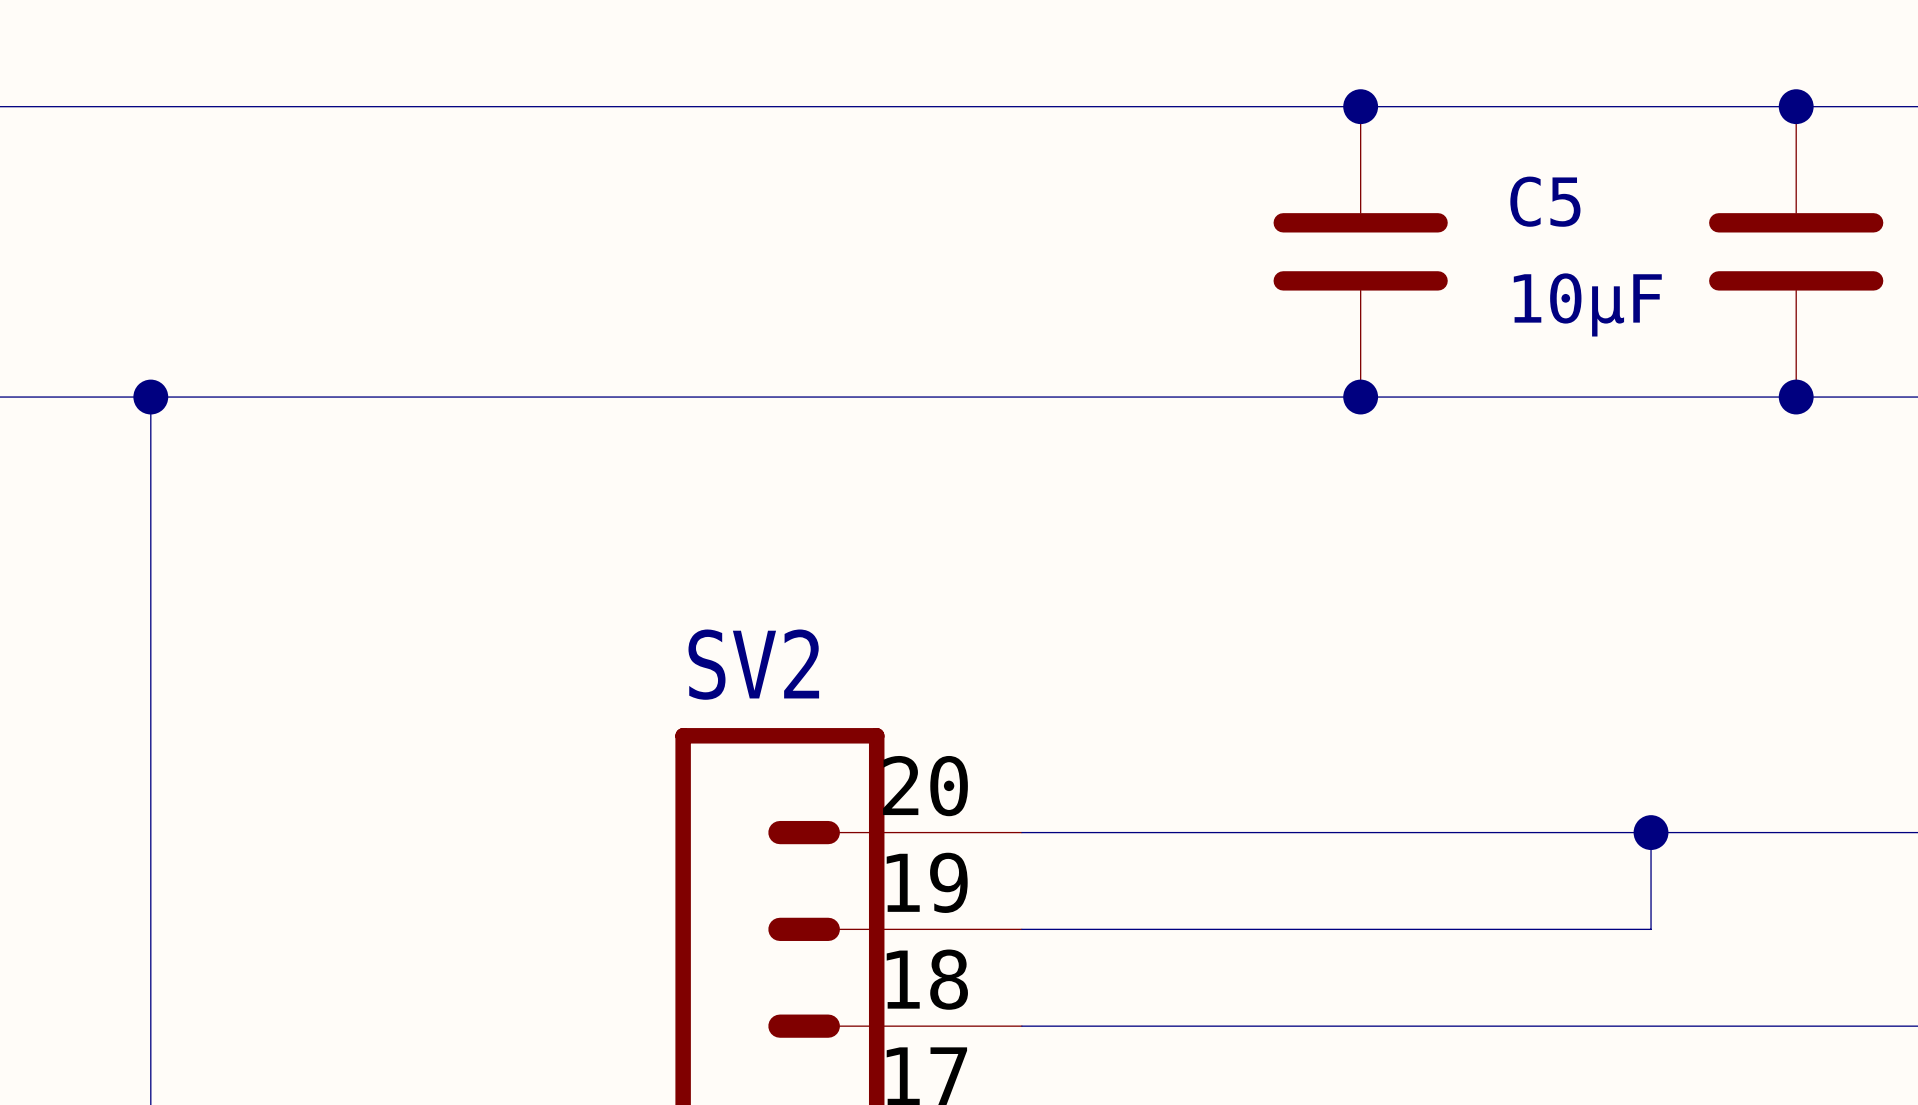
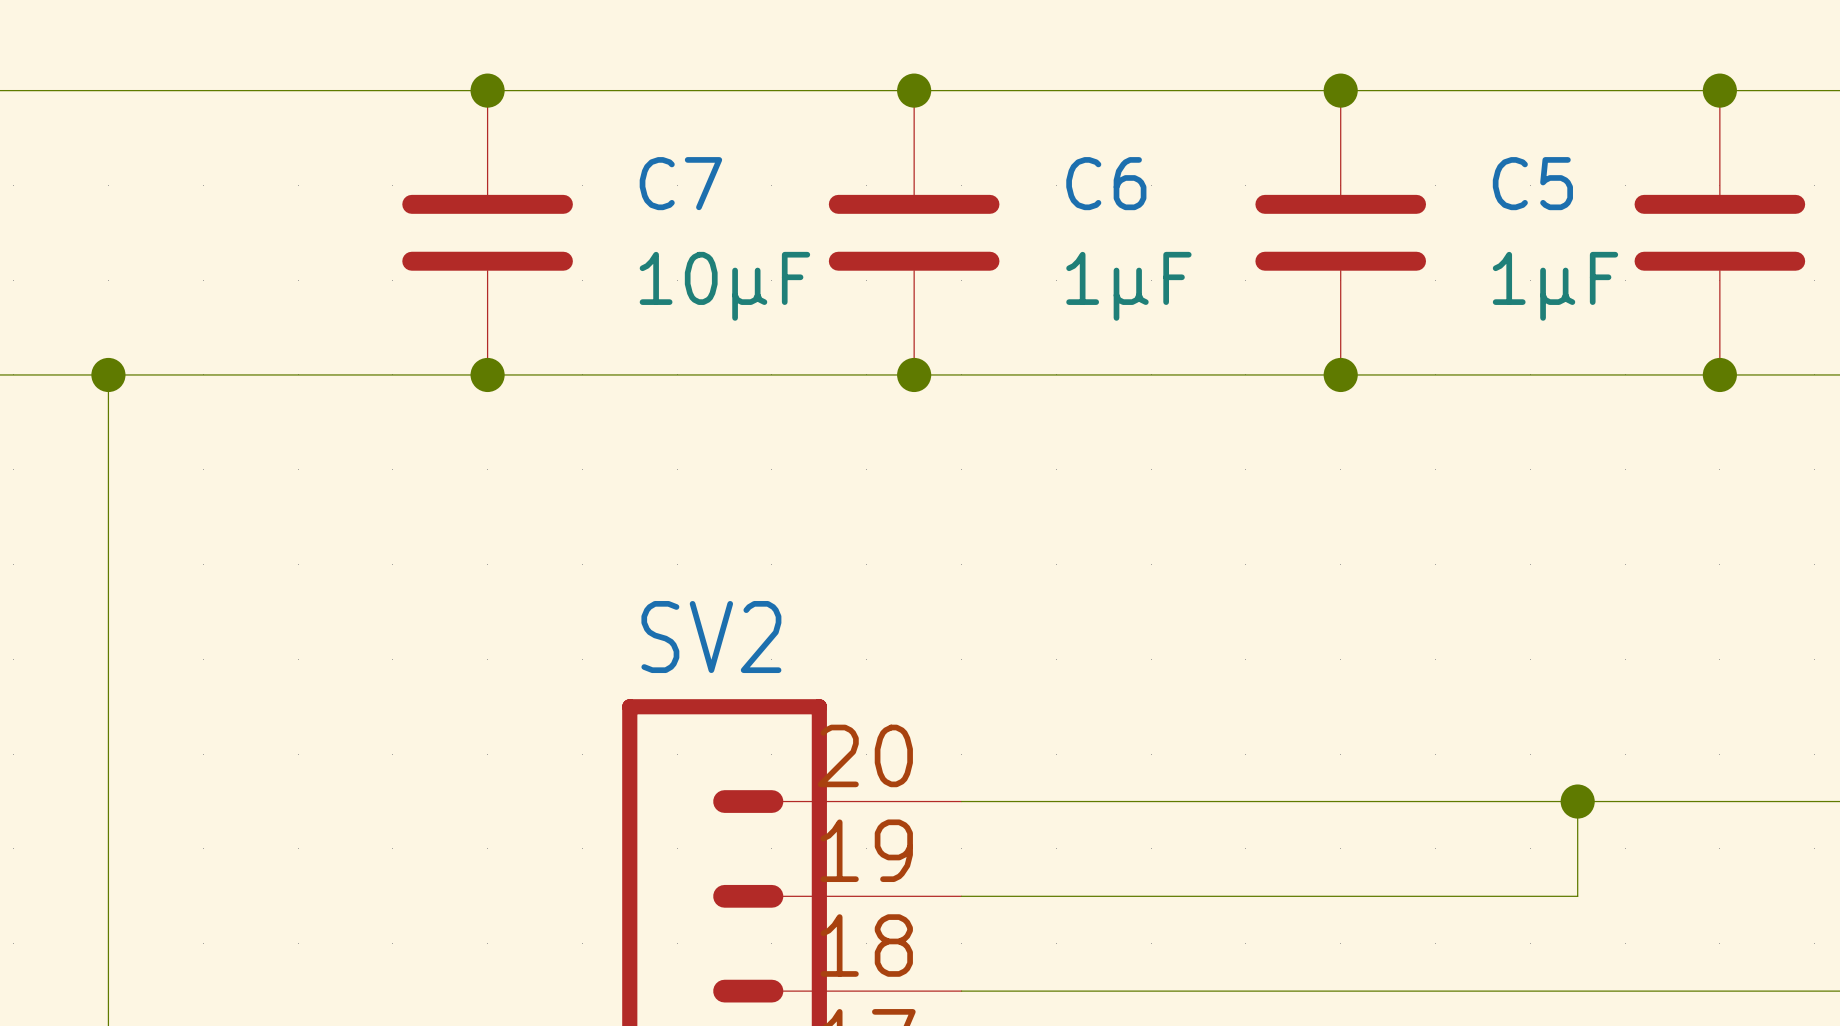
junction: none -> (487, 90)
junction: none -> (914, 90)
junction position: (1360, 106) -> (1340, 90)
C7: none -> 10µF (487, 232)
C6: none -> 1µF (914, 232)
C5 position: (1360, 251) -> (1340, 232)
C5 value: 10µF (1587, 304) -> 1µF (1555, 286)
junction: none -> (487, 374)
junction: none -> (914, 374)
junction position: (1360, 397) -> (1340, 374)

